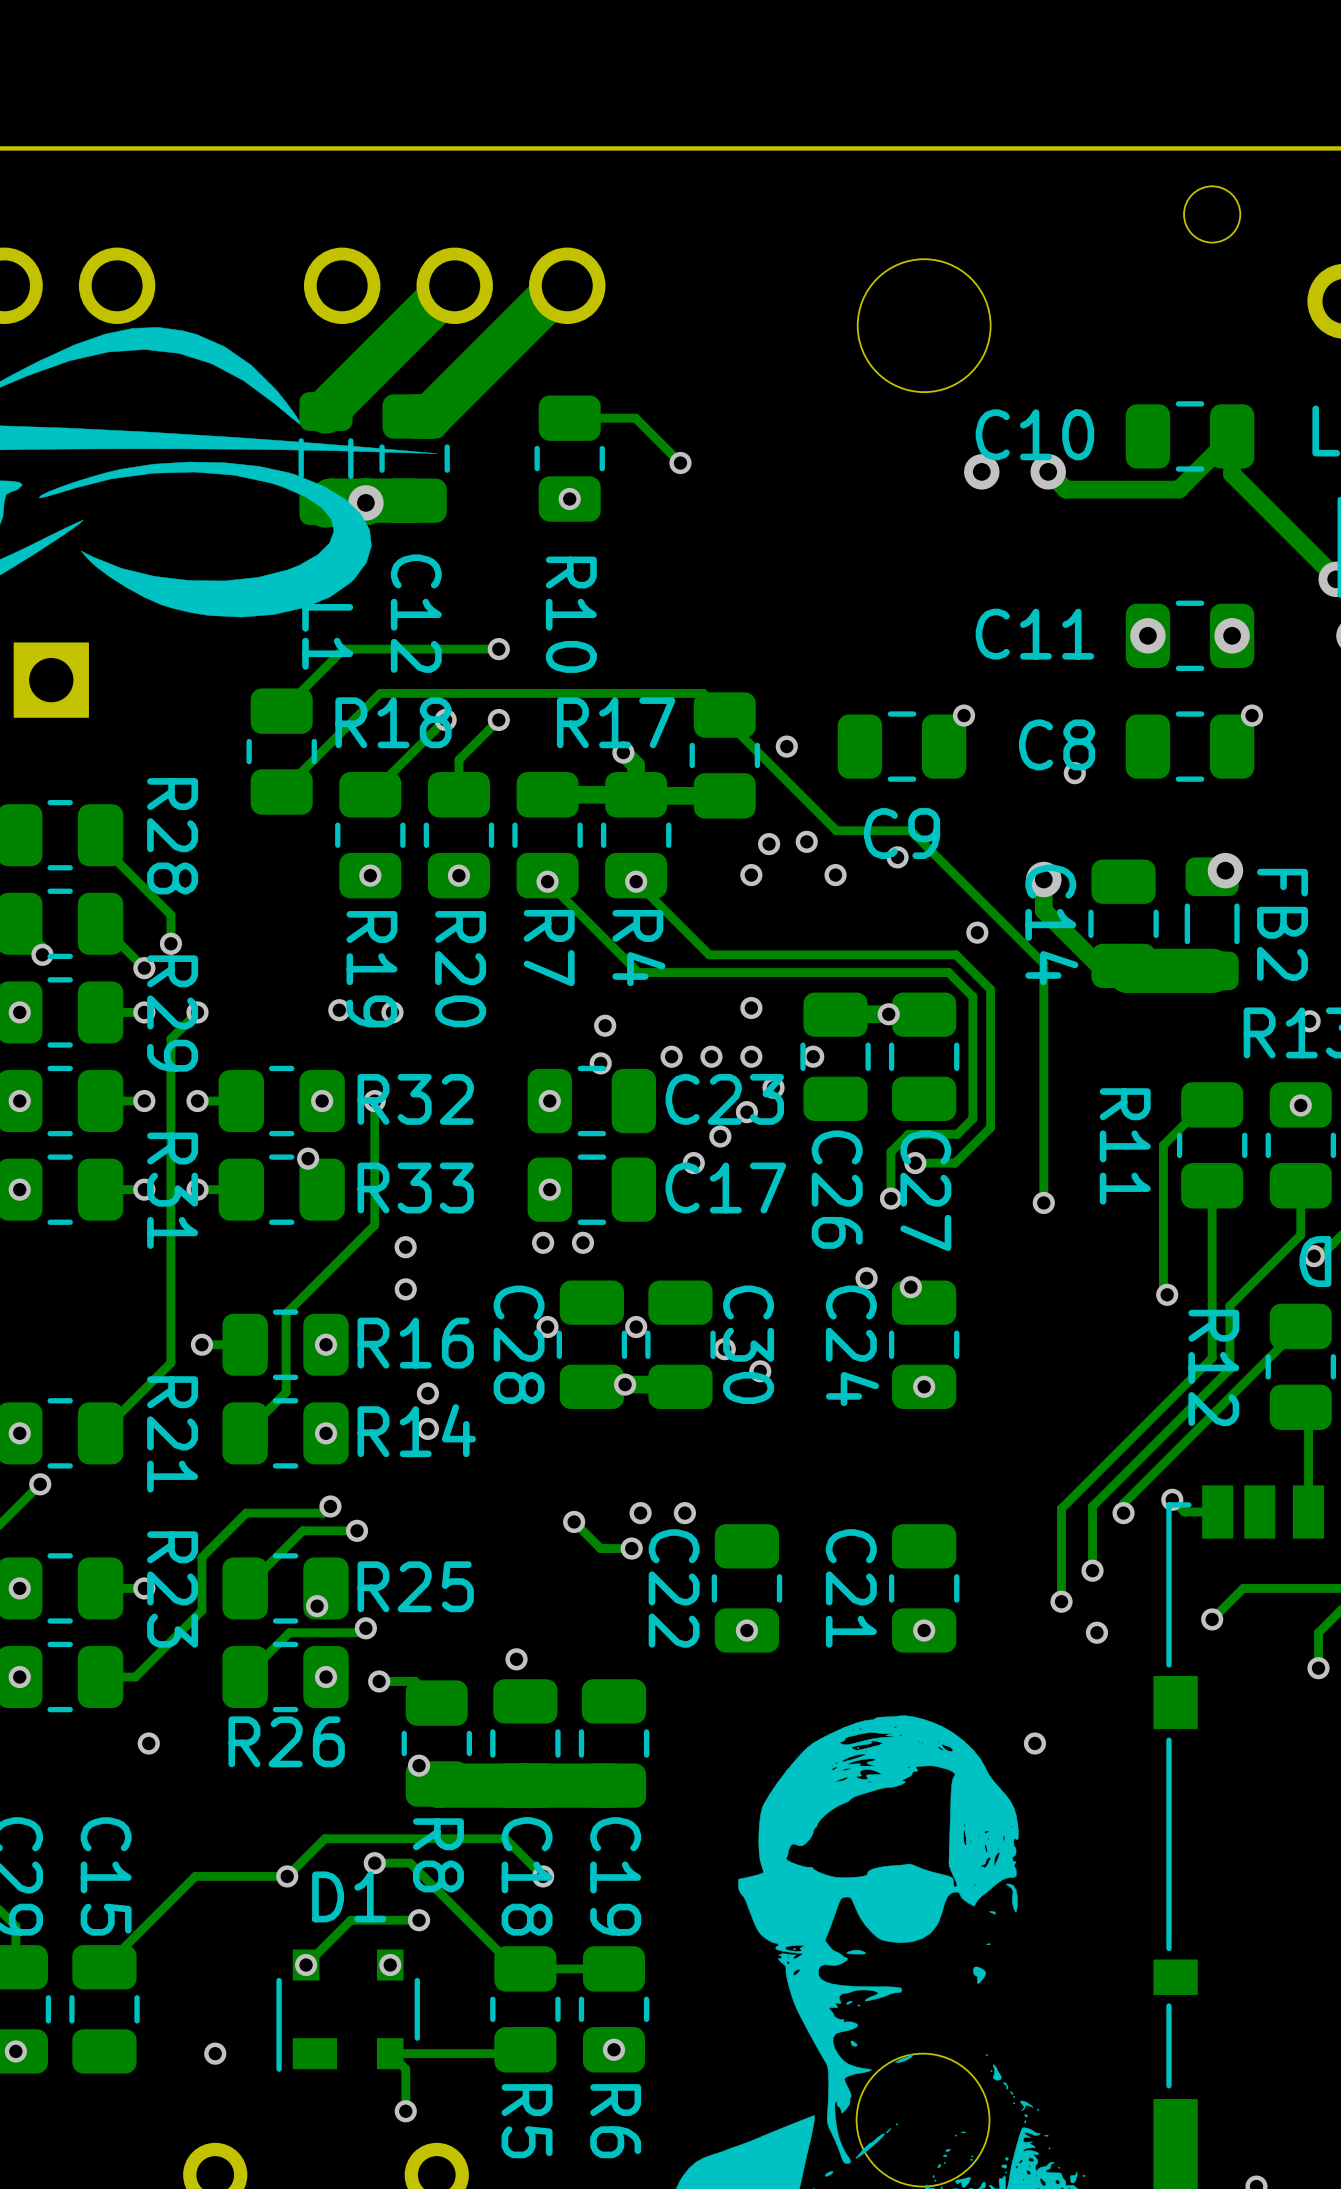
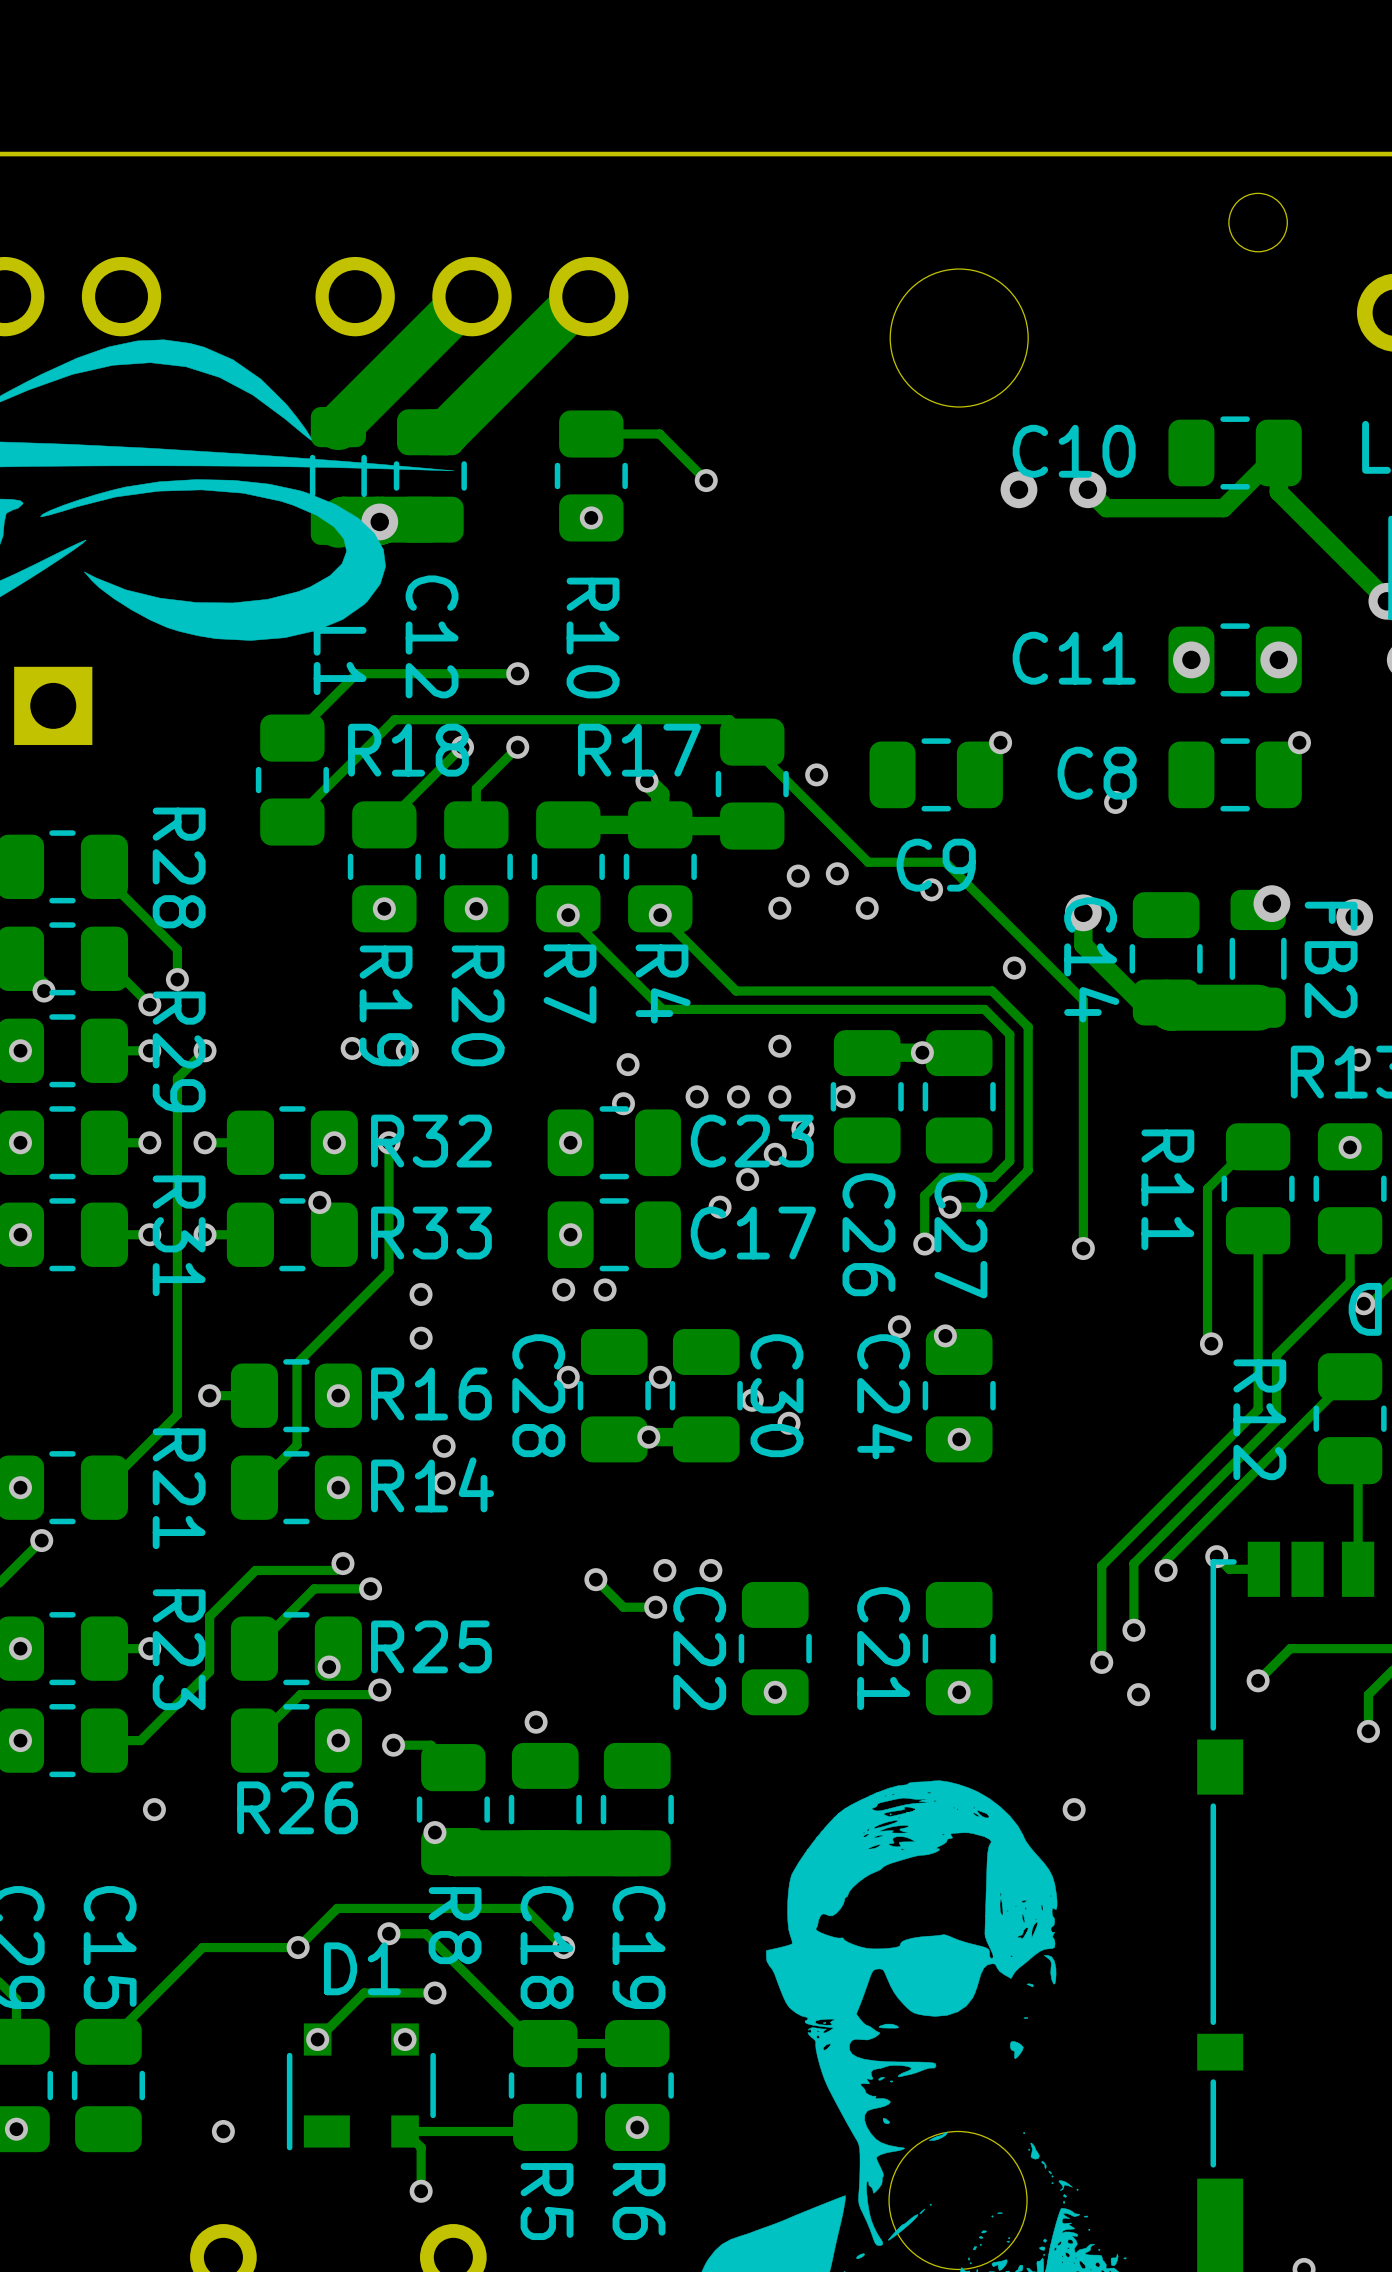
via: none -> (1354, 917)

